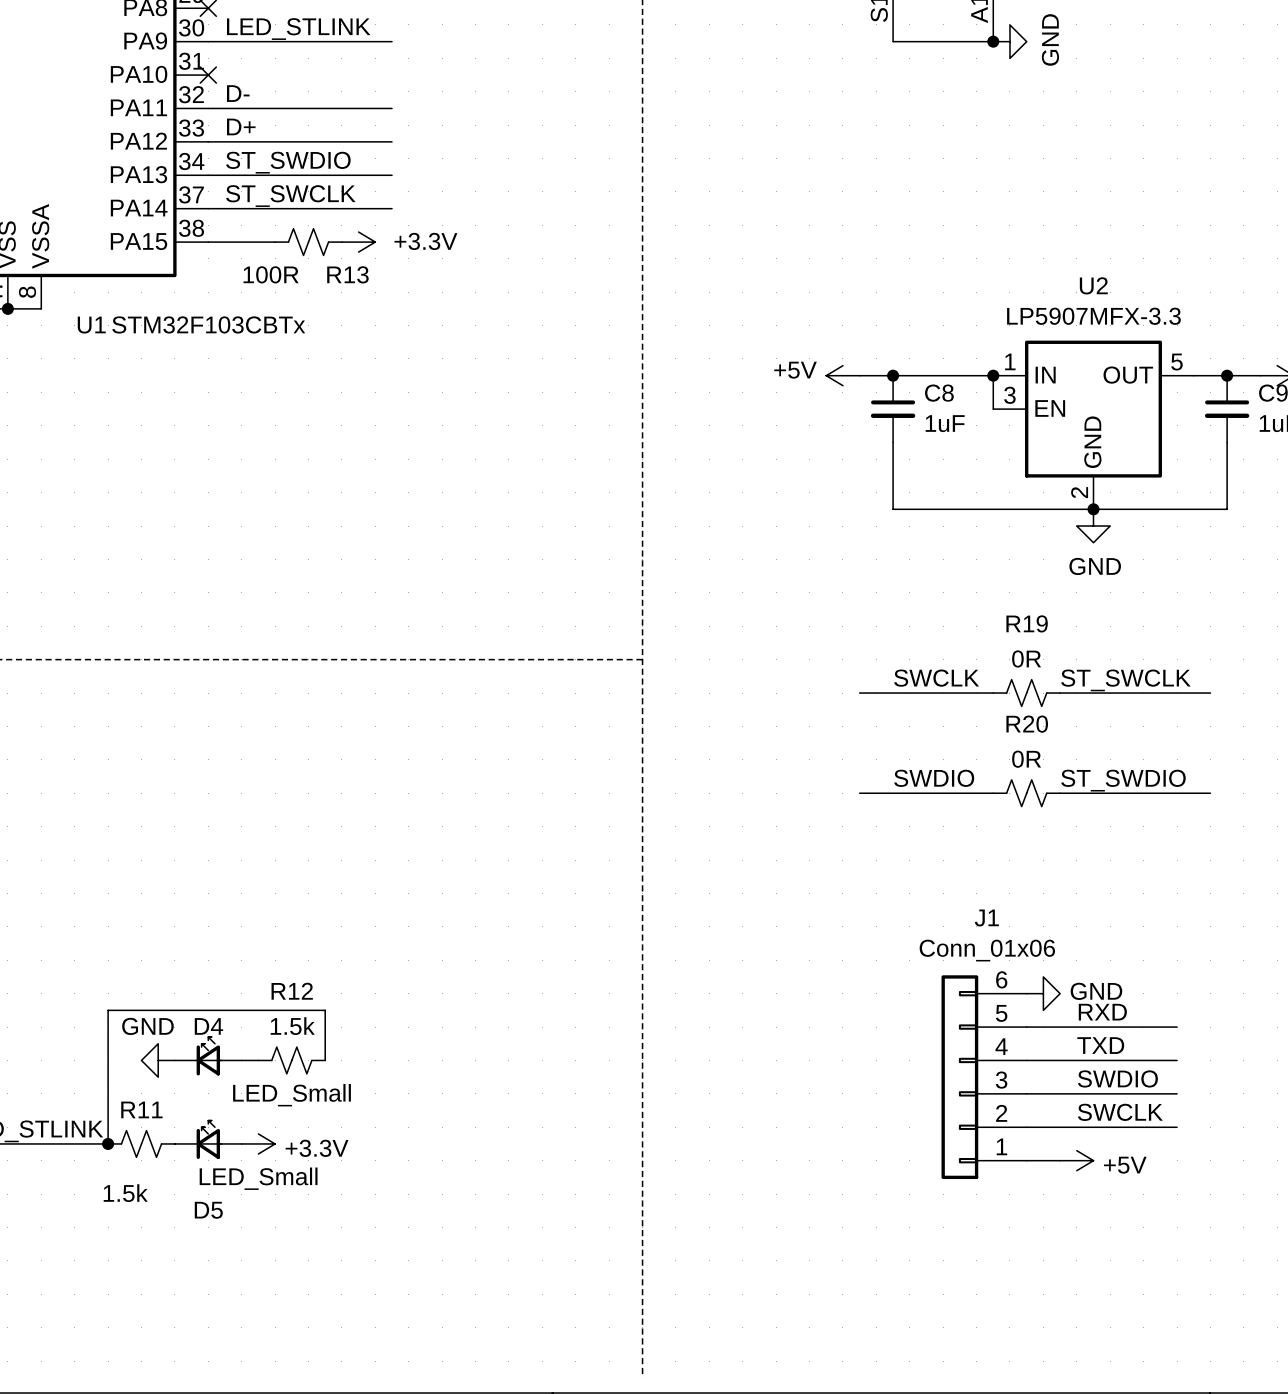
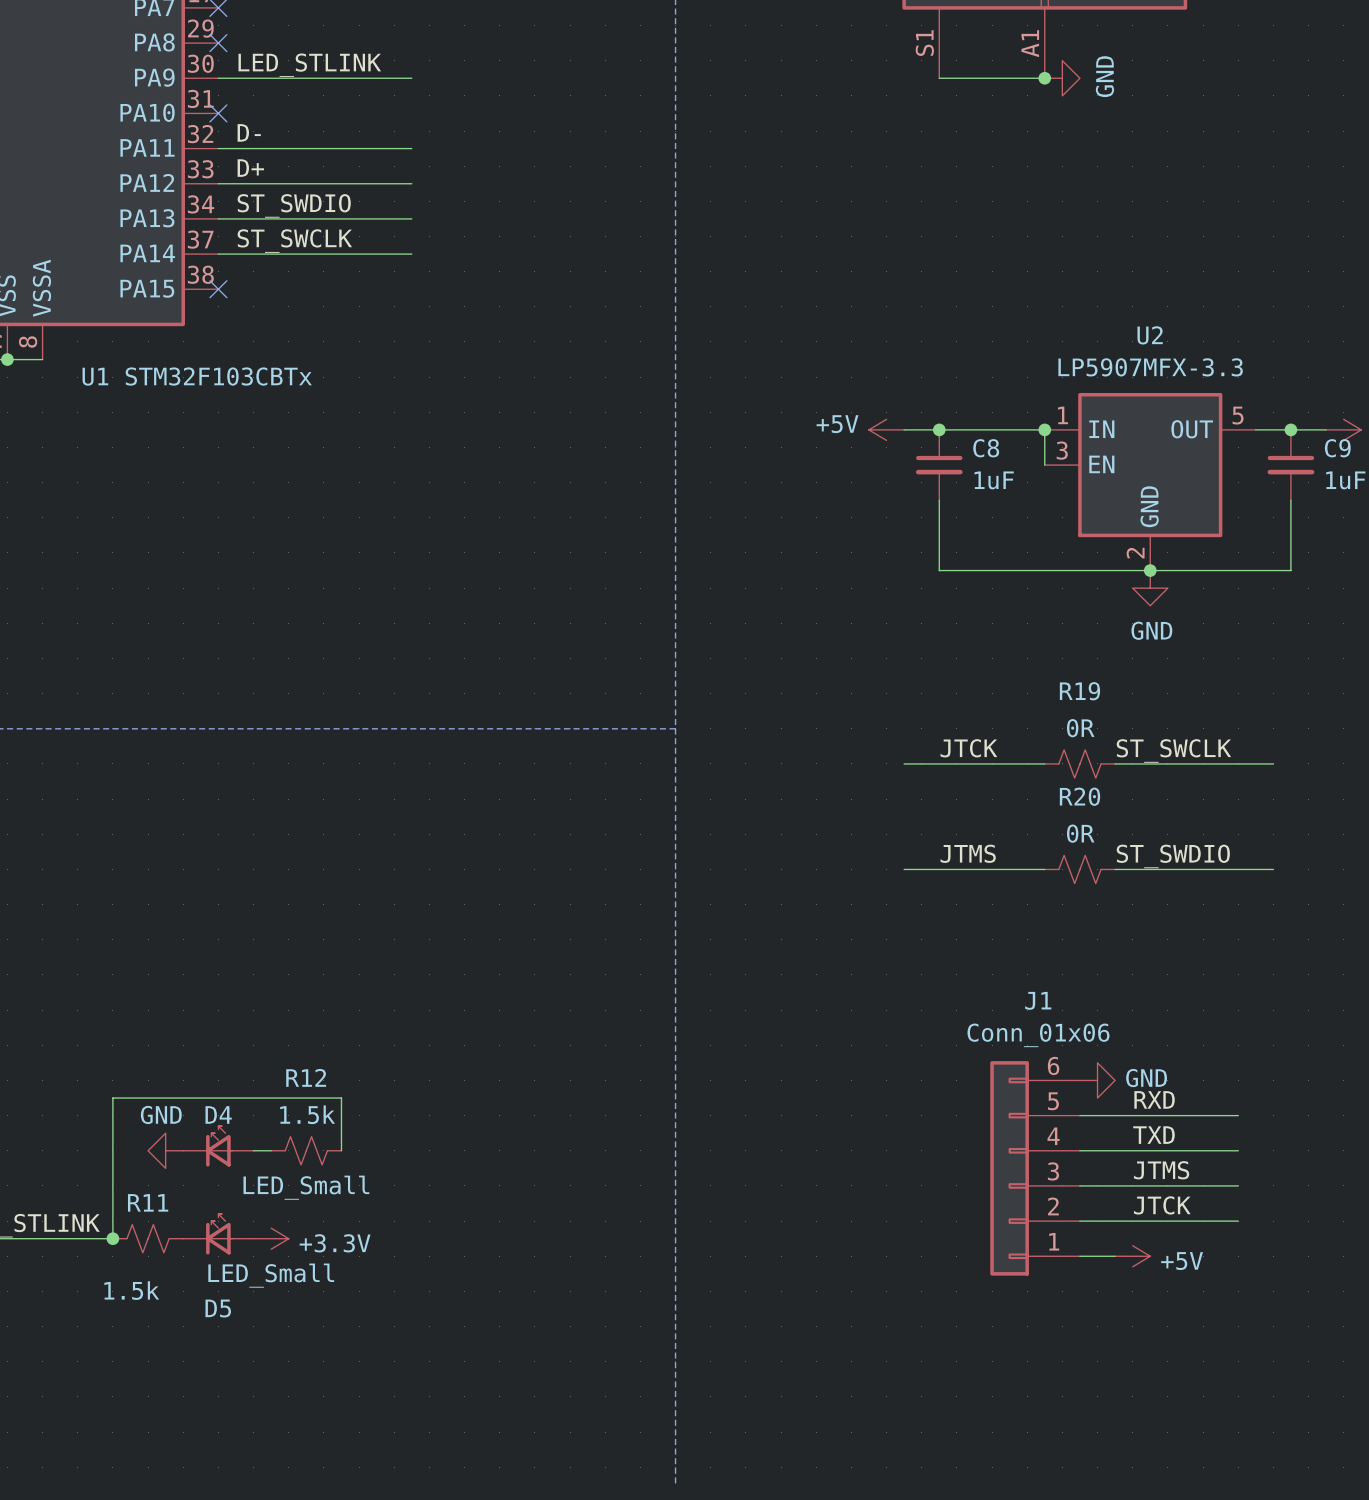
wire: (208, 242) (275, 242) -> none
no-connect mark: none -> (218, 289)
R13: 100R (308, 242) -> none
power symbol: +3.3V (358, 242) -> none
label: SWCLK (936, 678) -> JTCK (968, 748)
label: SWDIO (934, 778) -> JTMS (968, 853)
label: SWDIO (1117, 1078) -> JTMS (1161, 1170)
label: SWCLK (1120, 1112) -> JTCK (1162, 1205)

